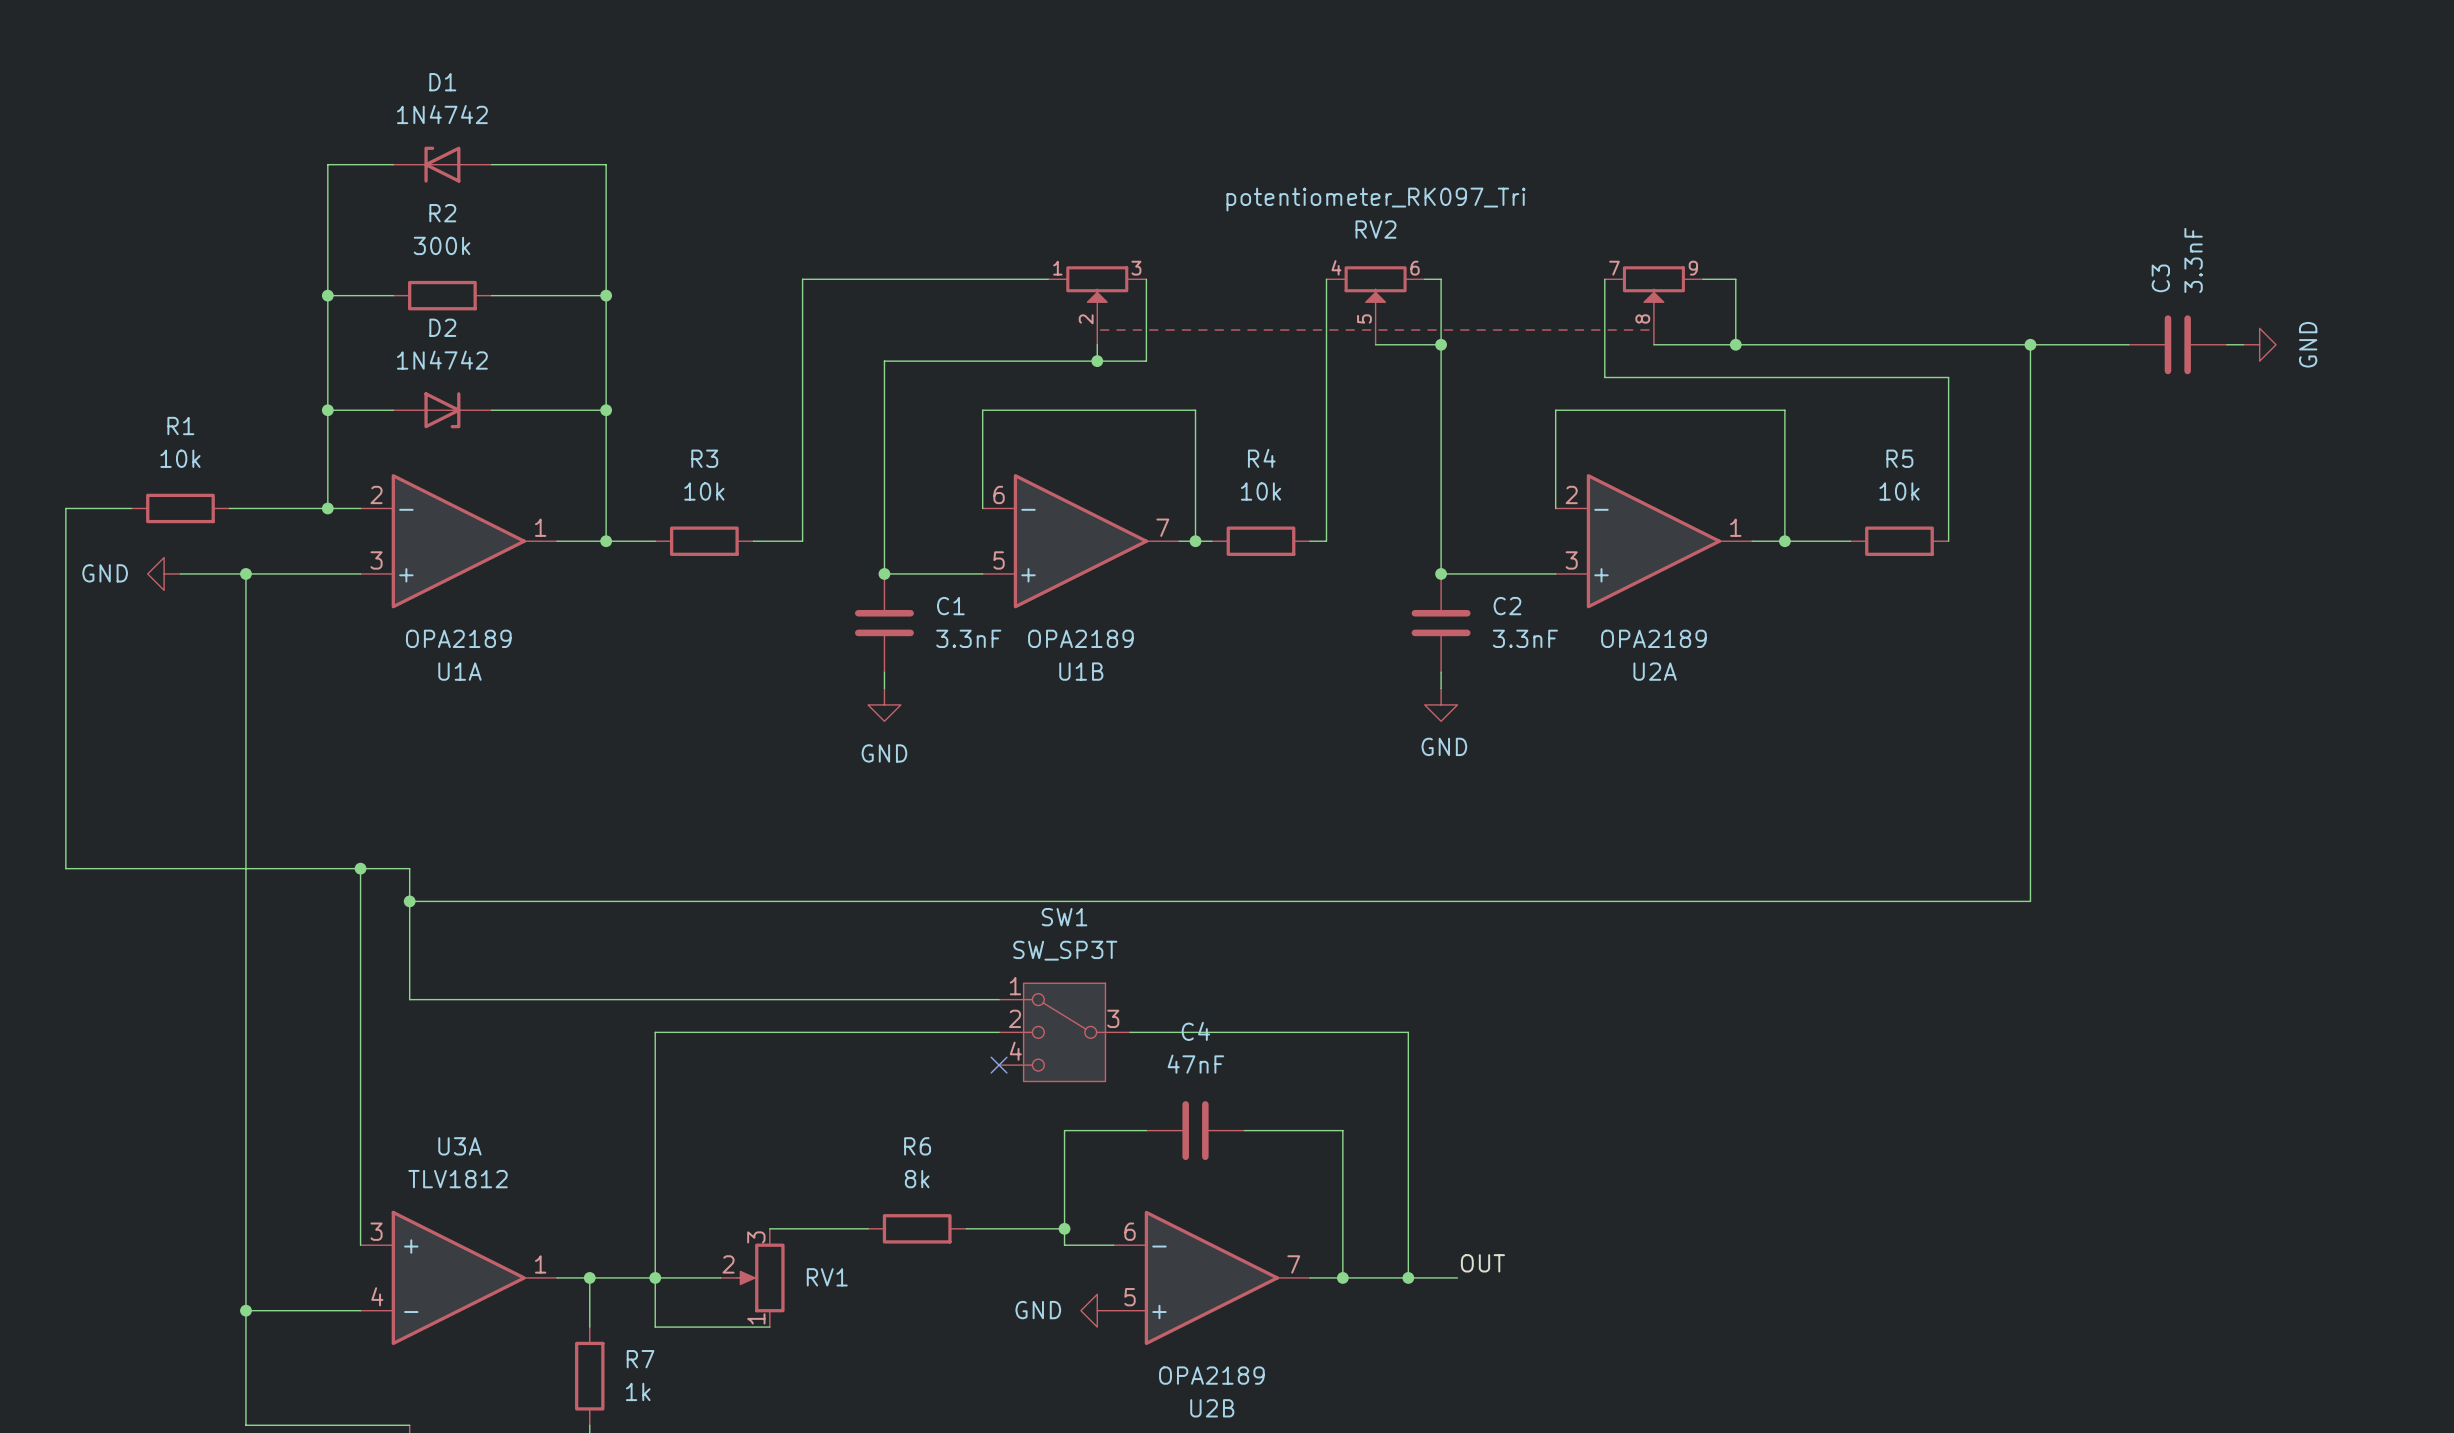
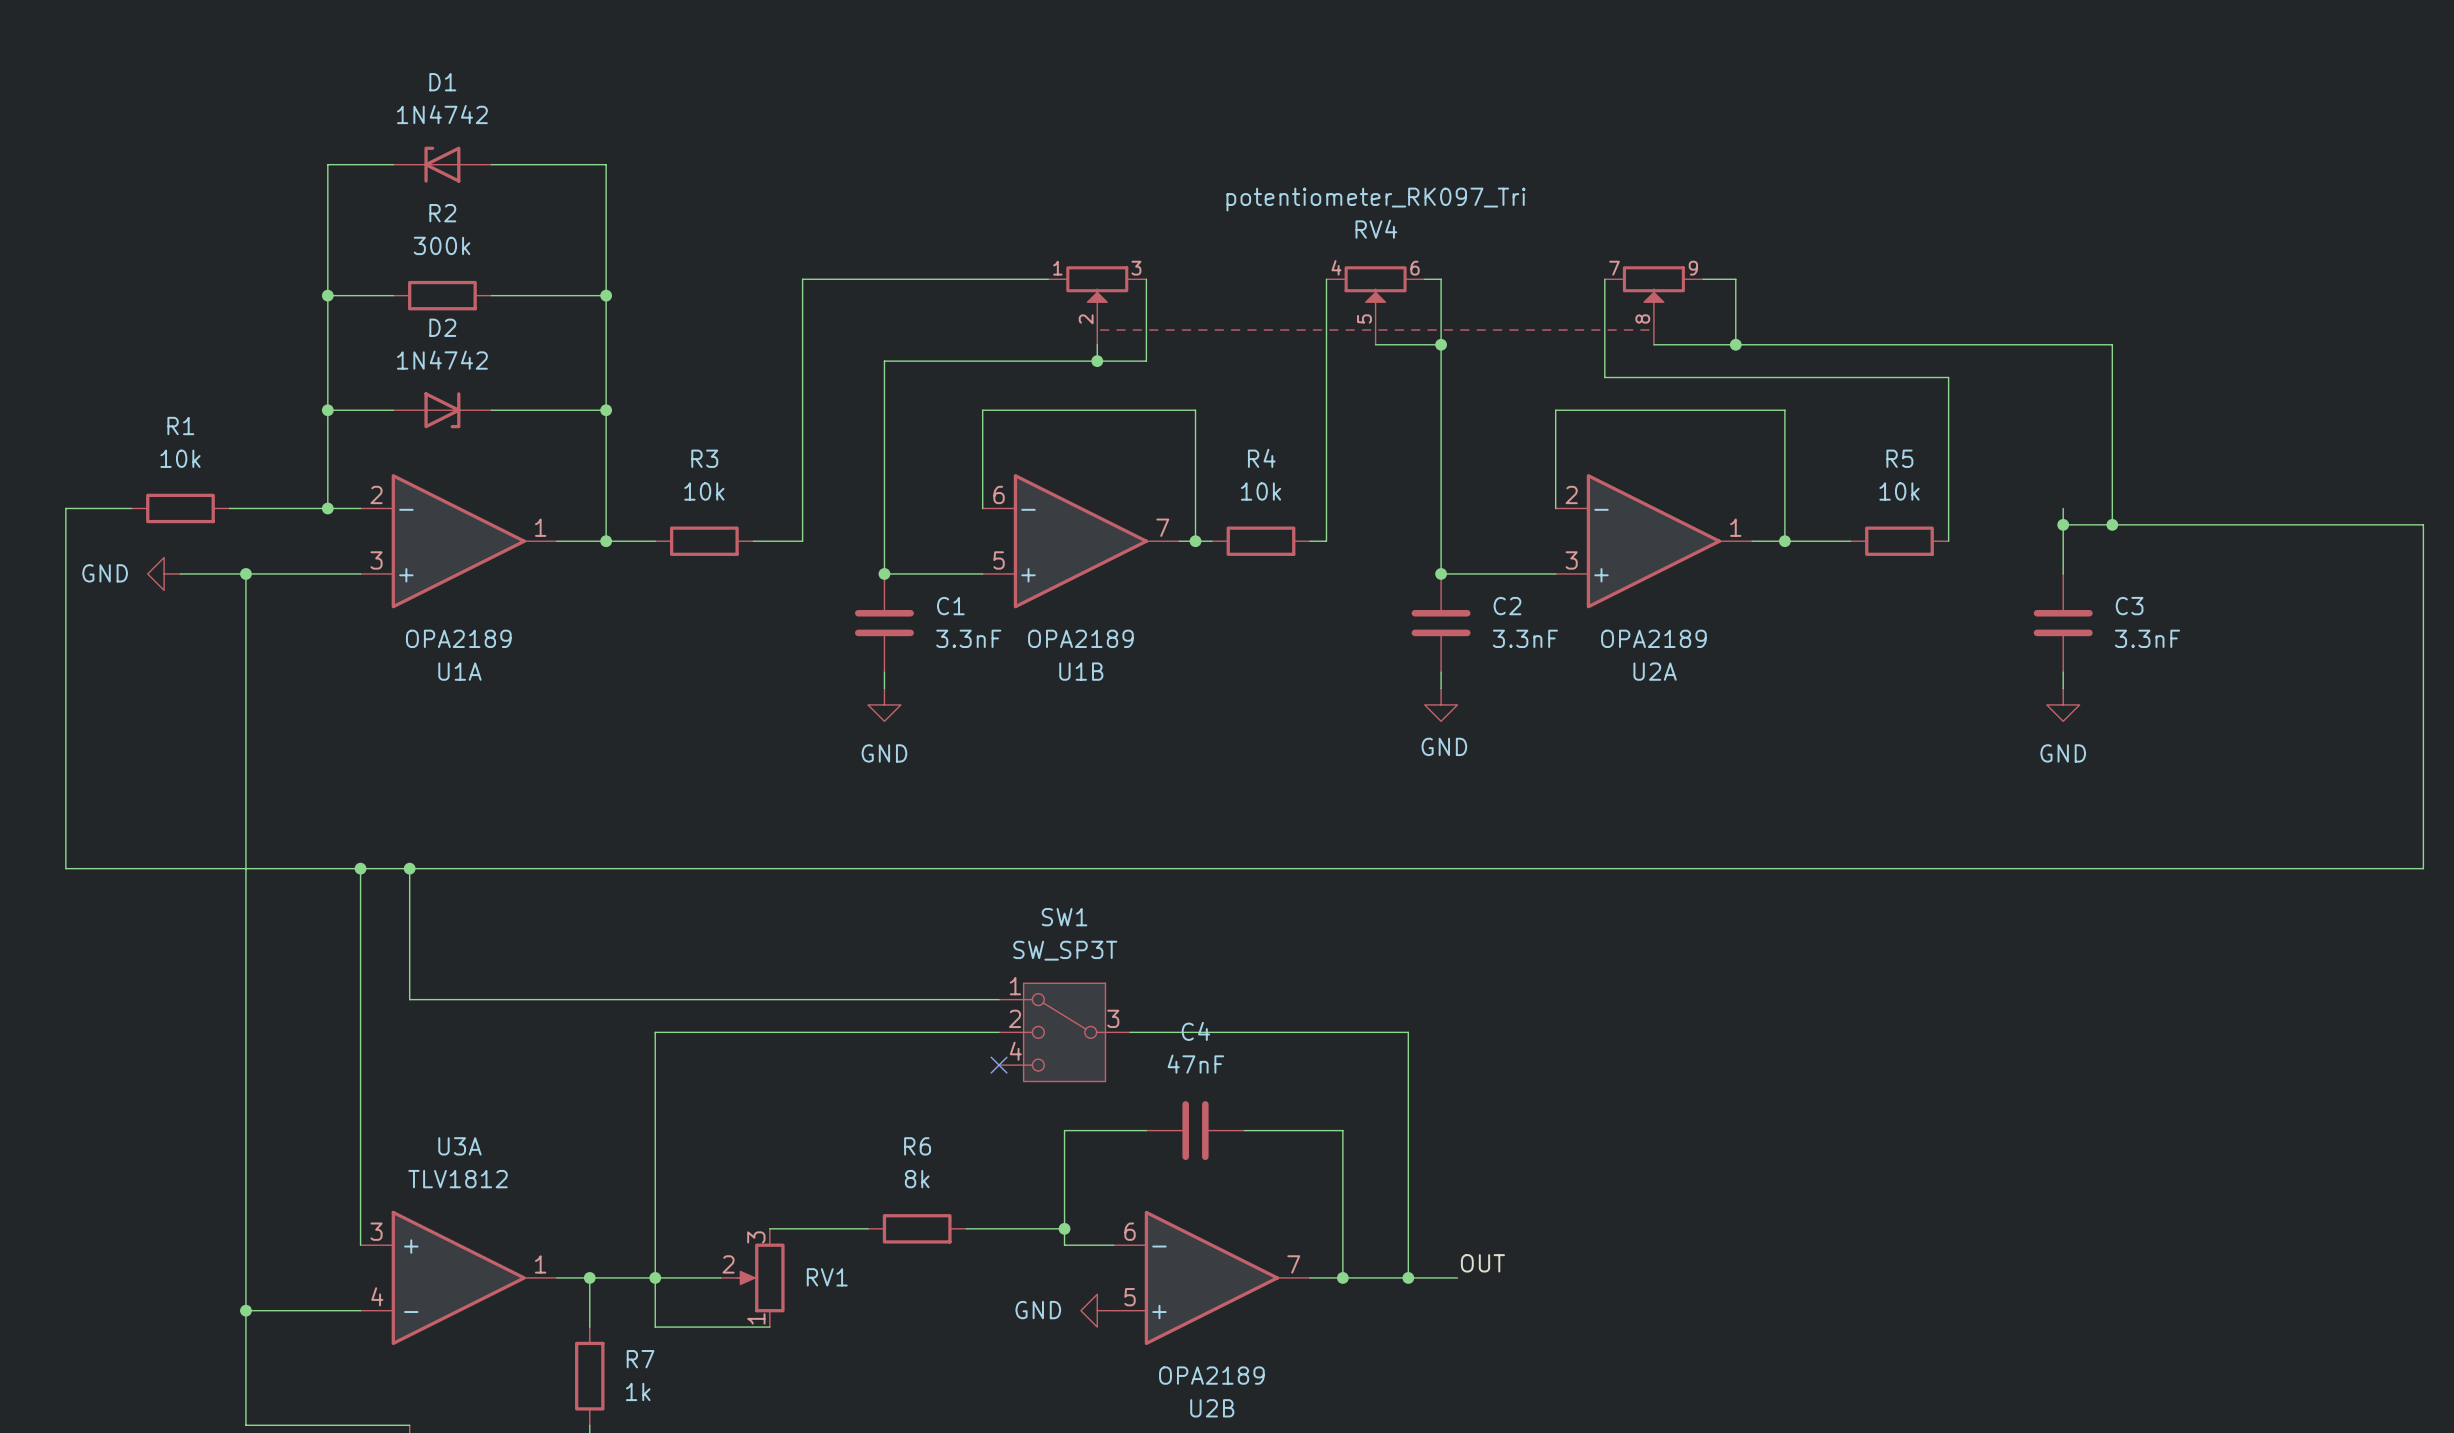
RV2 name: RV2 (1375, 229) -> RV4 (1376, 229)
wire: (2030, 344) (2030, 901) (409, 901) -> none
junction: (2030, 344) -> none
wire: (2112, 344) (2128, 344) -> (2112, 344) (2112, 524)
C3 rotation: 0° (2177, 344) -> 90° clockwise (2063, 623)
C3 position: (2177, 344) -> (2063, 623)
wire: (2226, 344) (2243, 344) -> none
power symbol: GND (2259, 344) -> none
wire: none -> (2063, 508) (2063, 573)
wire: none -> (2063, 524) (2423, 524) (2423, 868) (409, 868)
junction: none -> (2063, 524)
junction: none -> (2112, 524)
wire: none -> (2063, 672) (2063, 688)
power symbol: none -> GND (2063, 704)
junction position: (409, 901) -> (409, 868)

